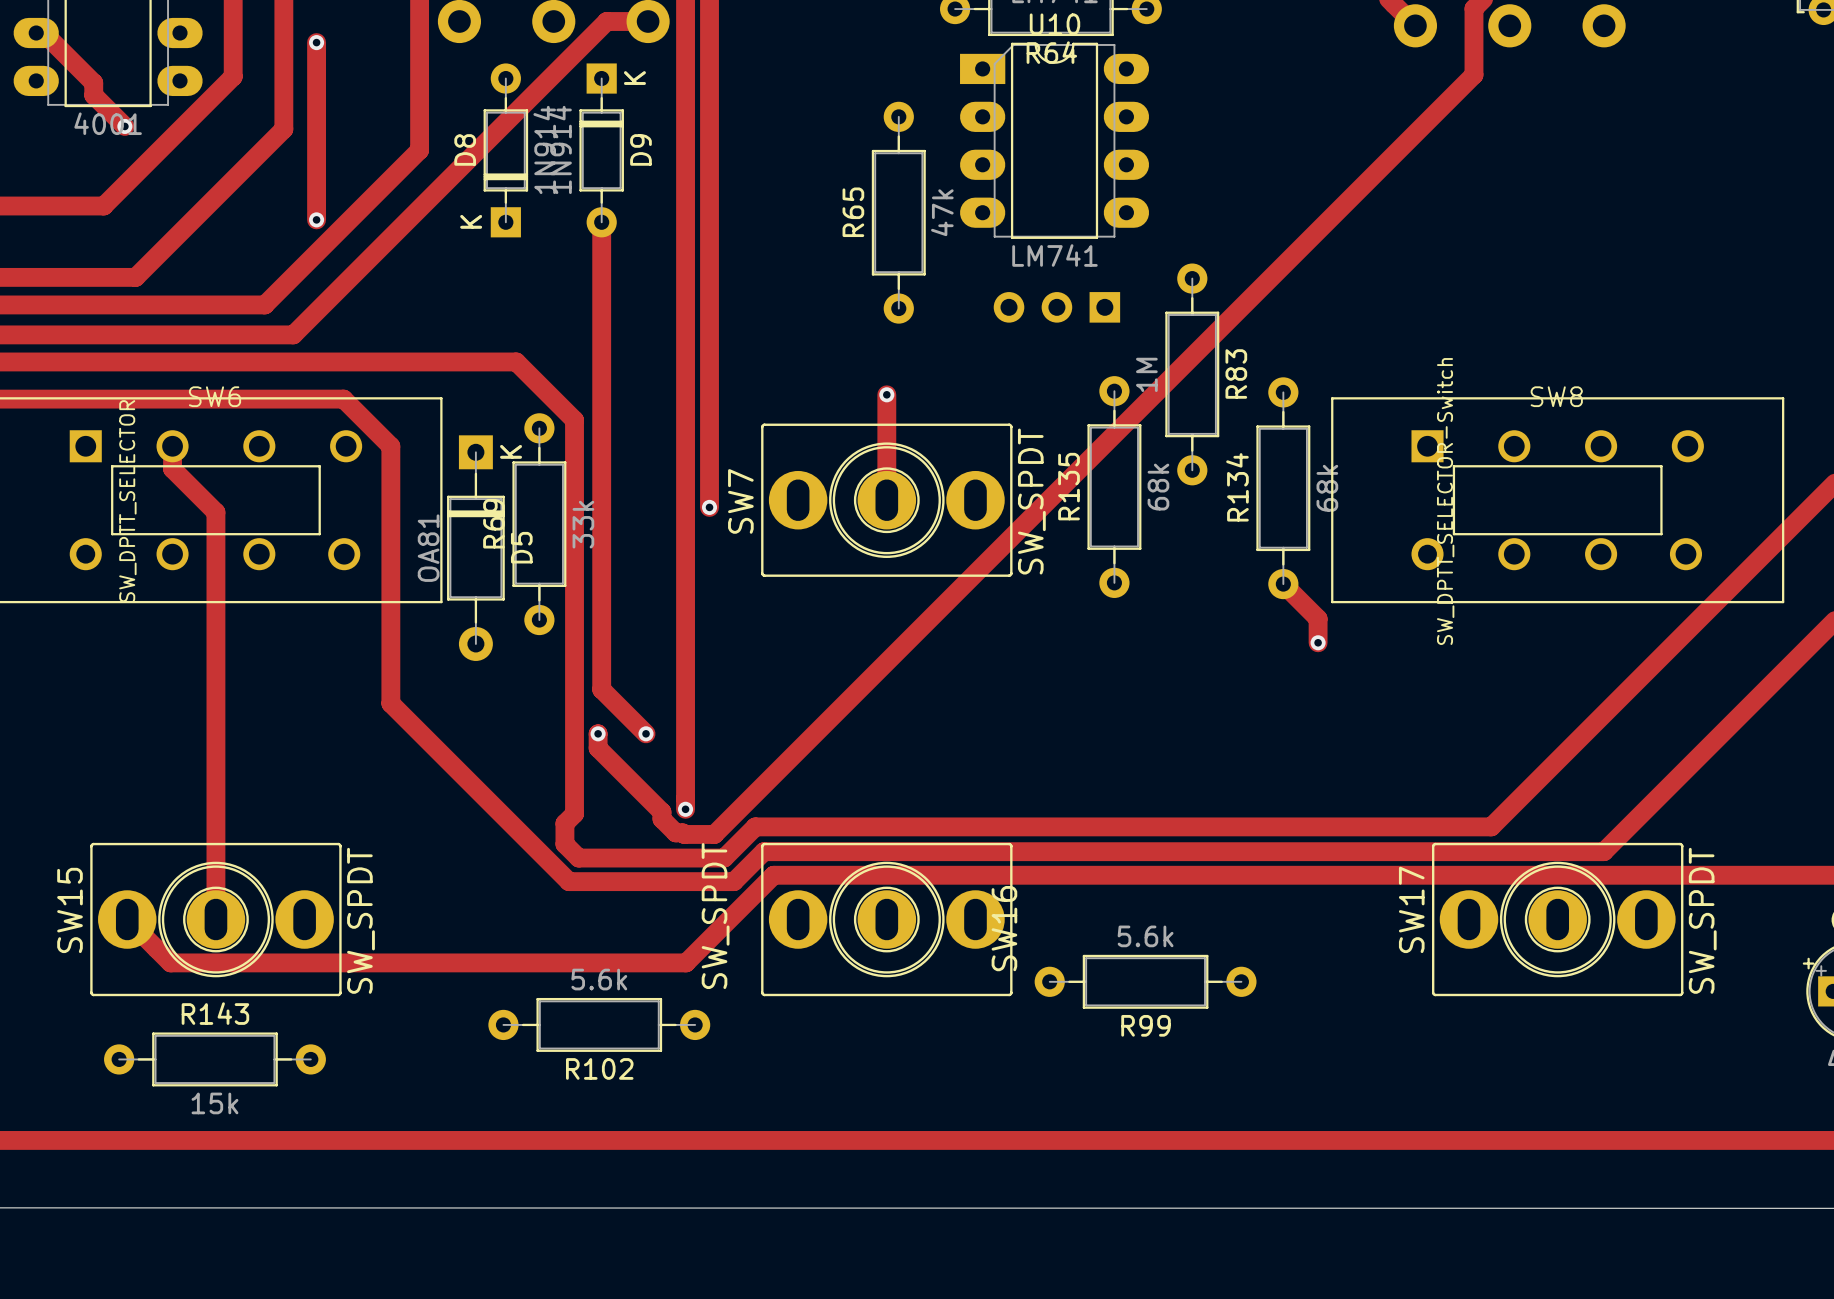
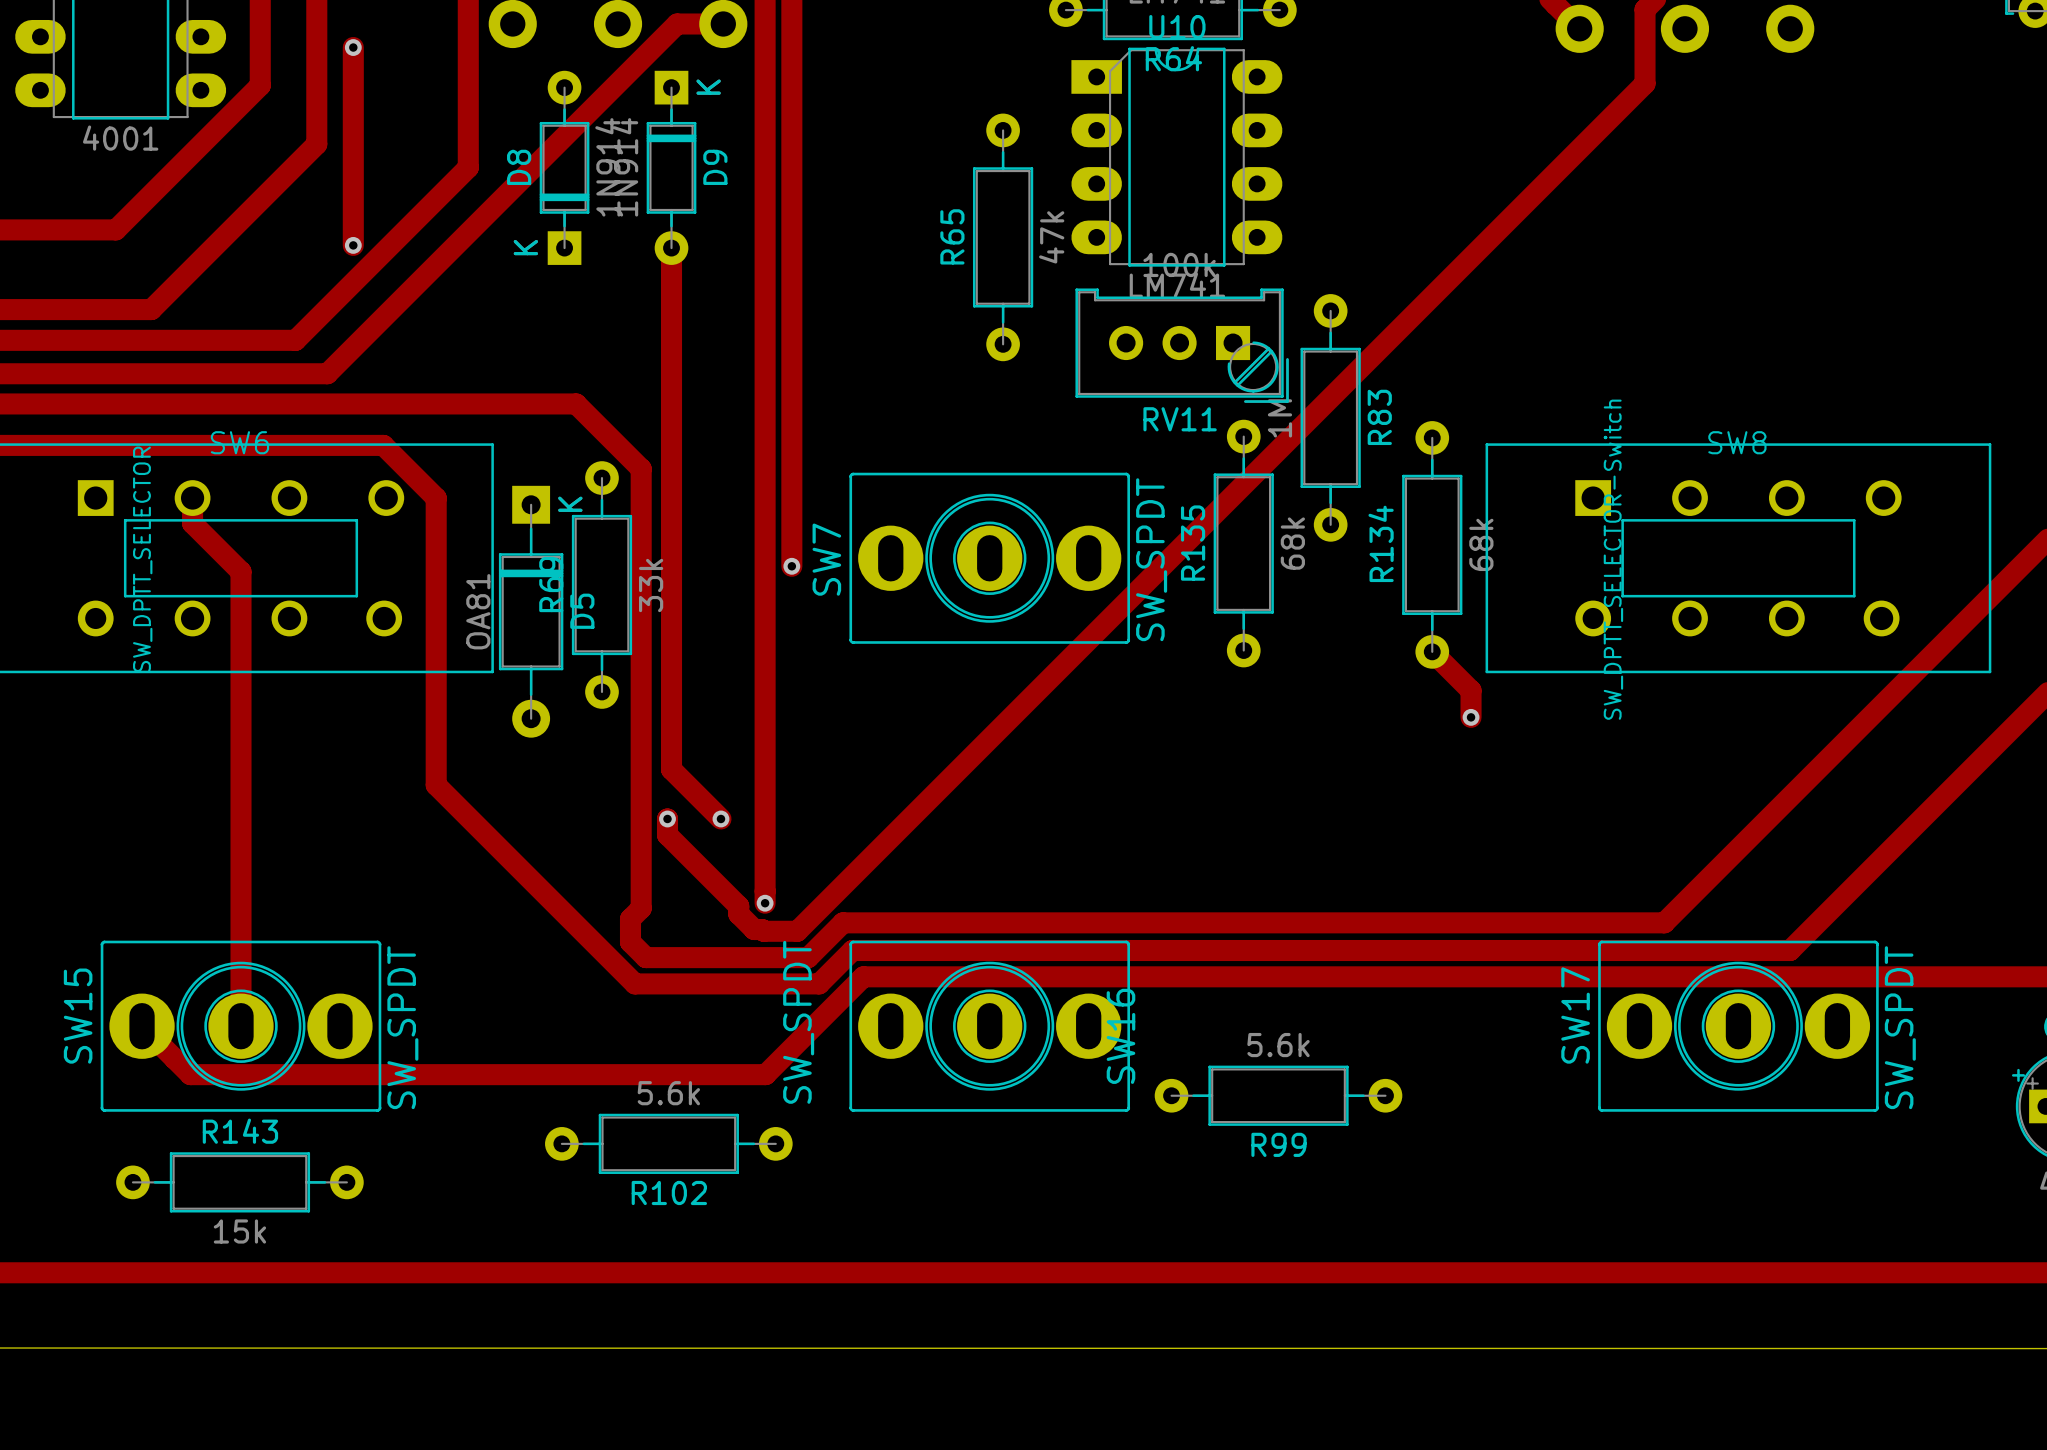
track: (36, 33) (43, 33) (93, 82) (93, 95) (124, 126) -> none
via: (124, 126) -> none
RV11 side: bottom (1056, 307) -> top (1182, 345)
track: (886, 394) (886, 500) -> none
via: (886, 394) -> none

